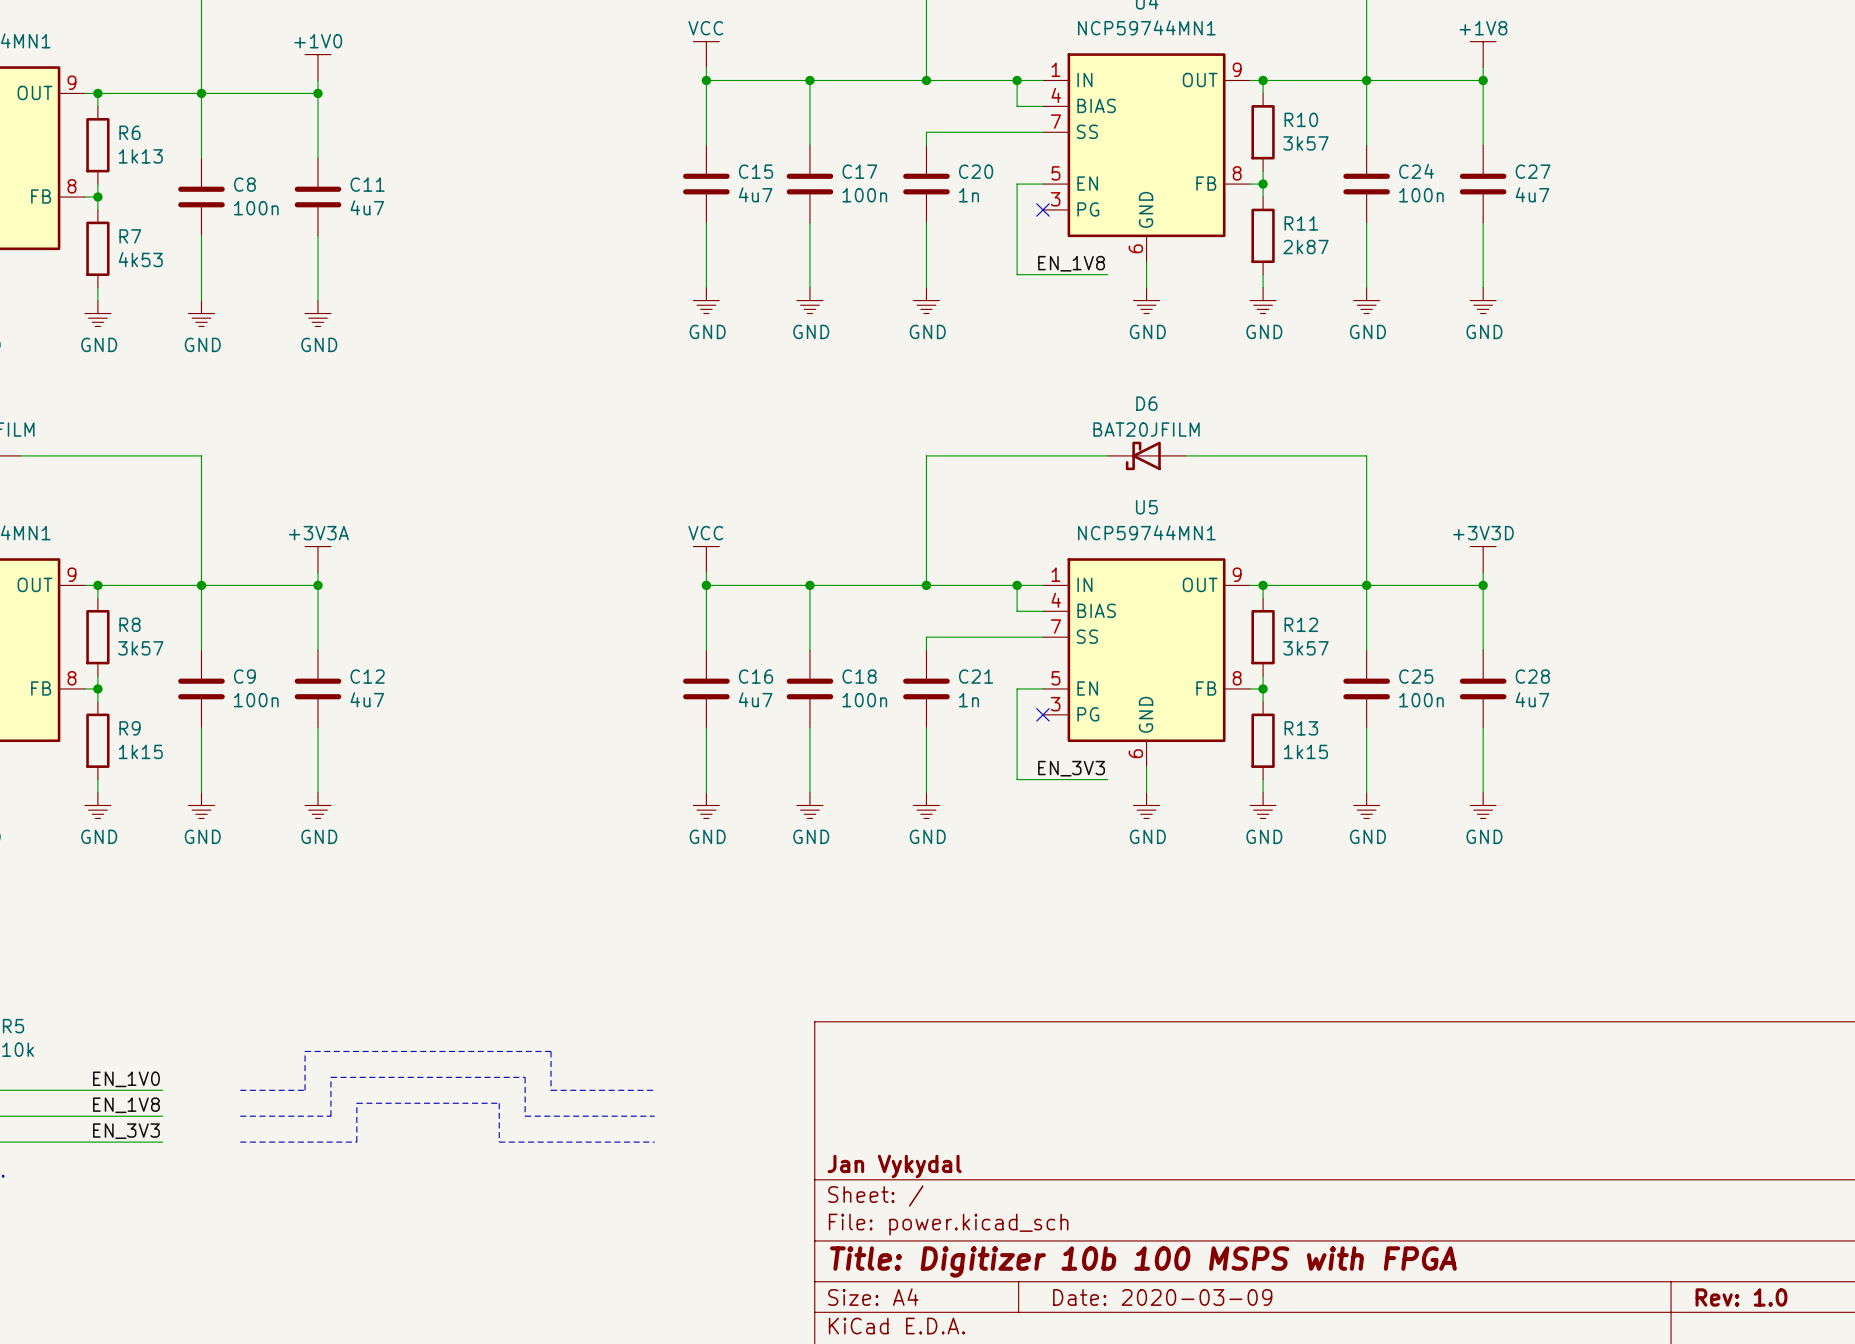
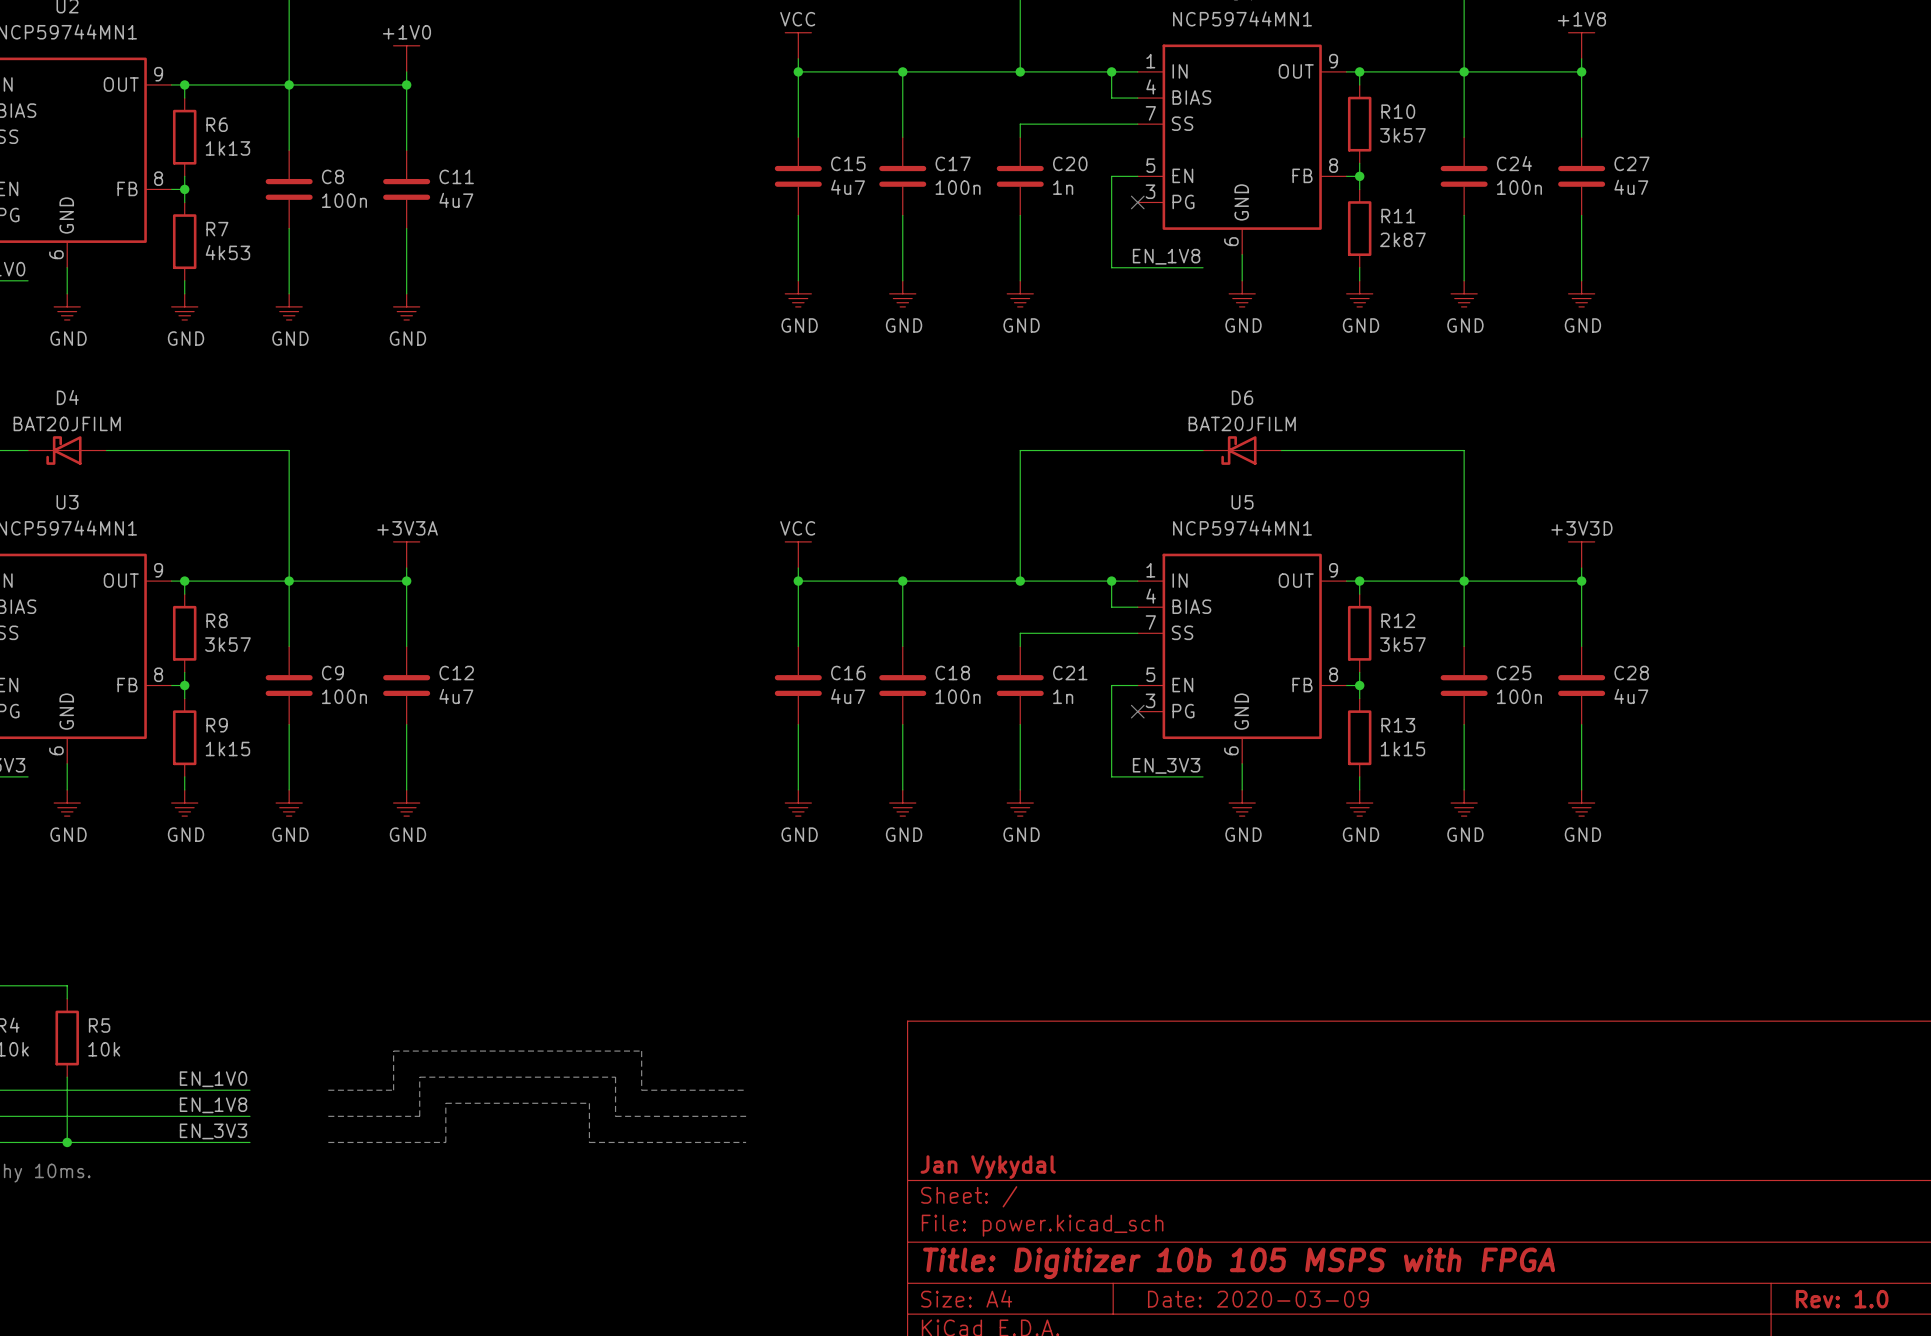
title block: Title: Digitizer 10b 100 MSPS with FPGA (1143, 1261) -> Title: Digitizer 10b 105 MSPS with FPGA (1239, 1263)

